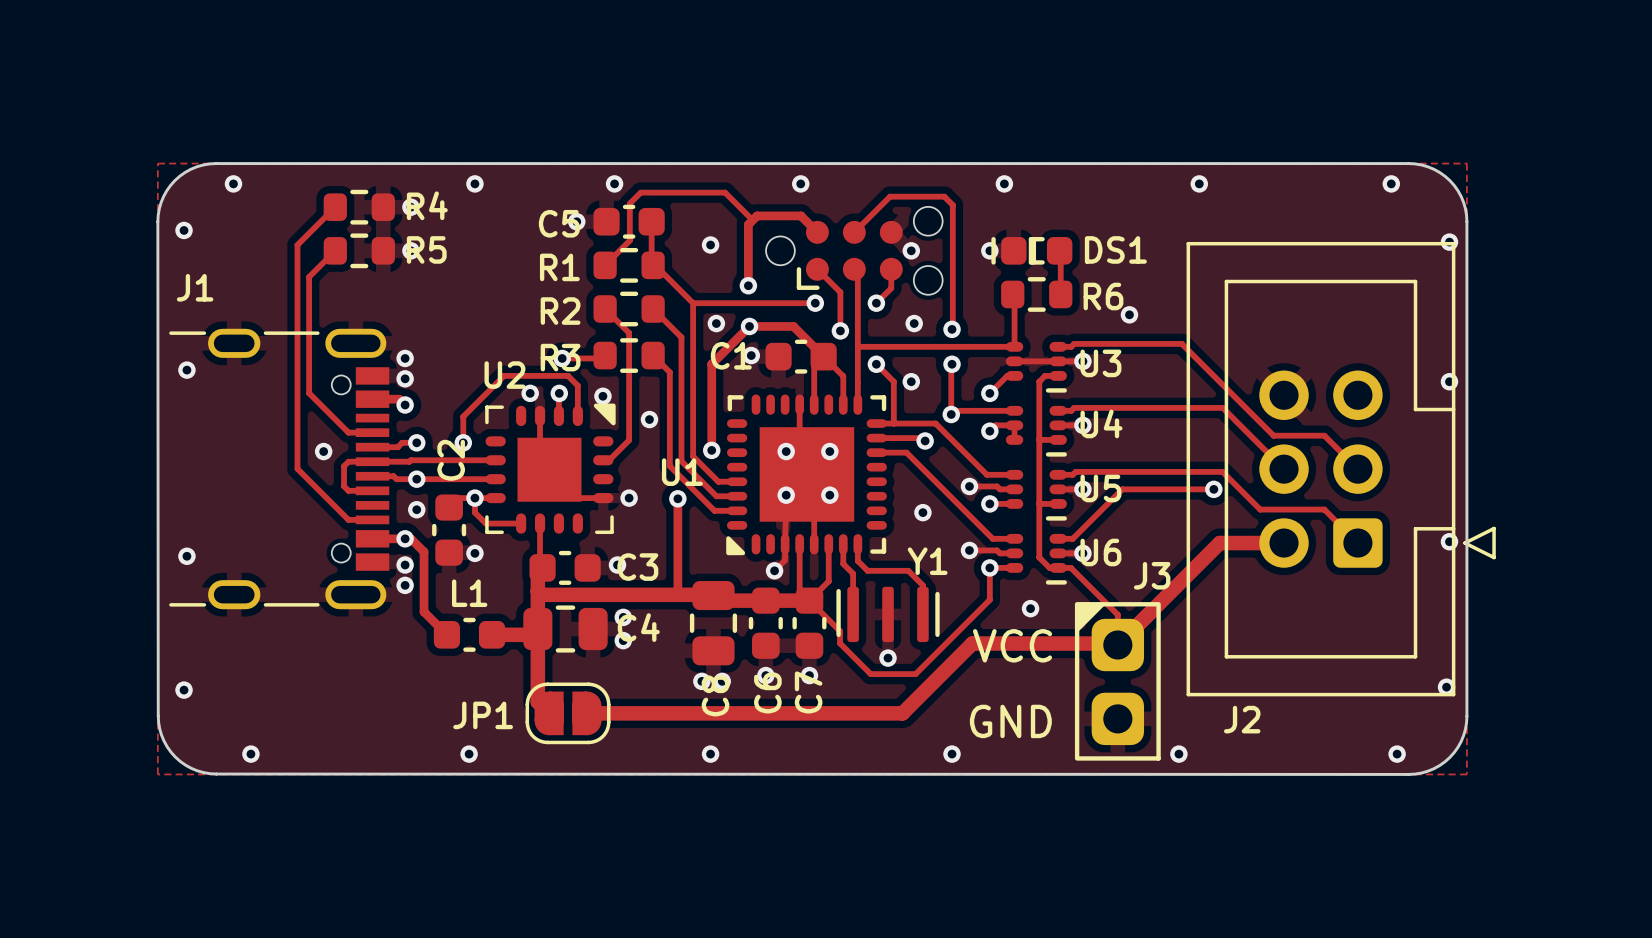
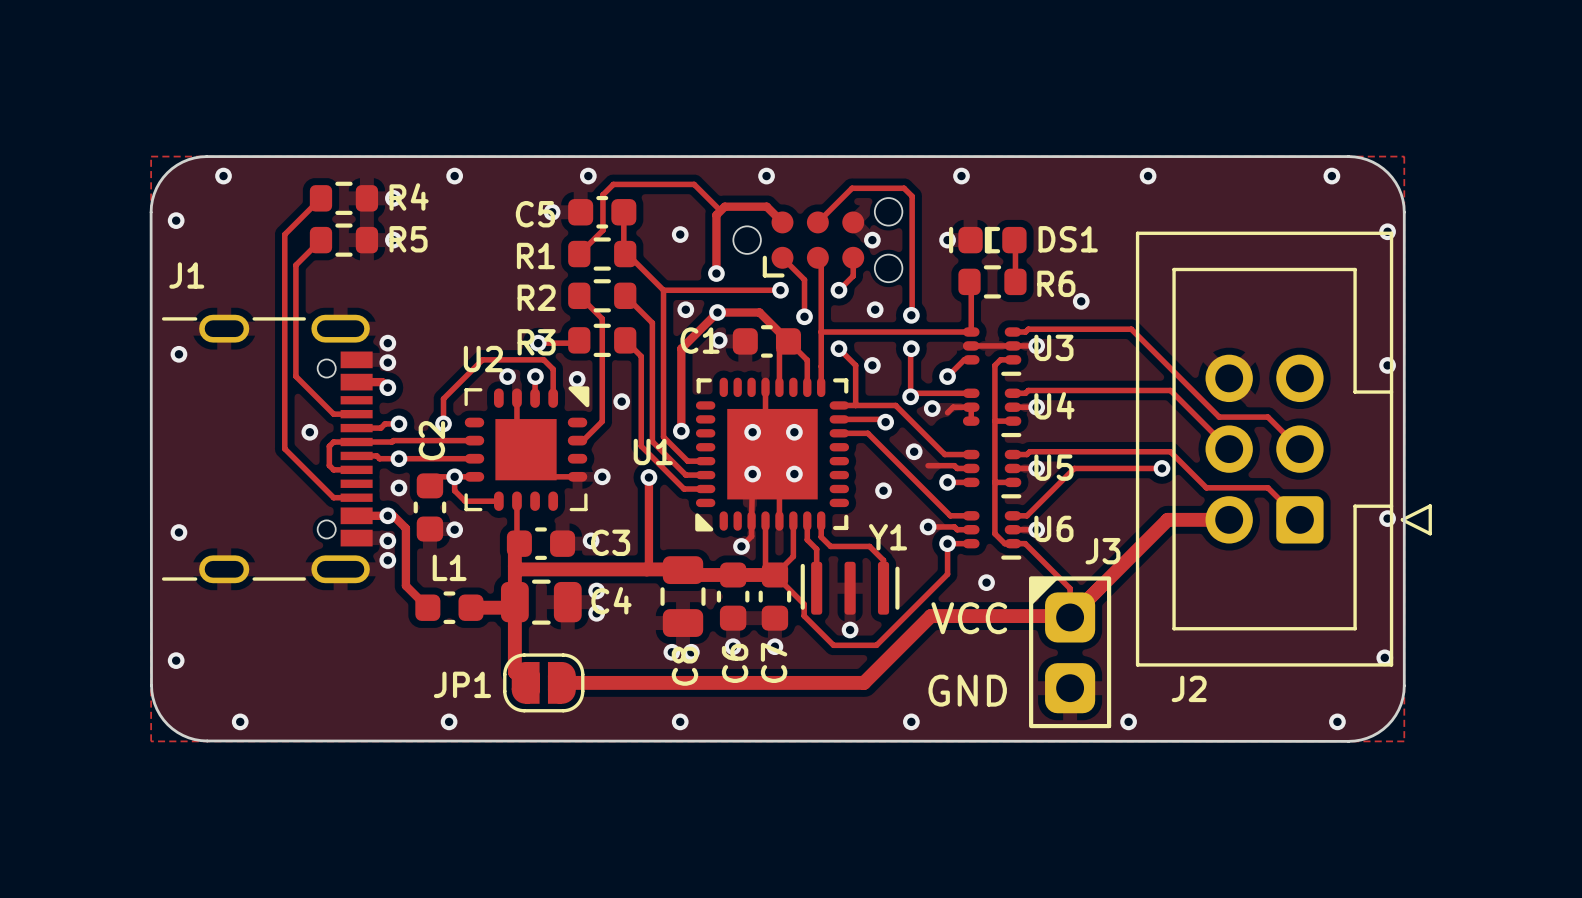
via position: (989, 431) -> (932, 408)
via position: (969, 486) -> (914, 451)

